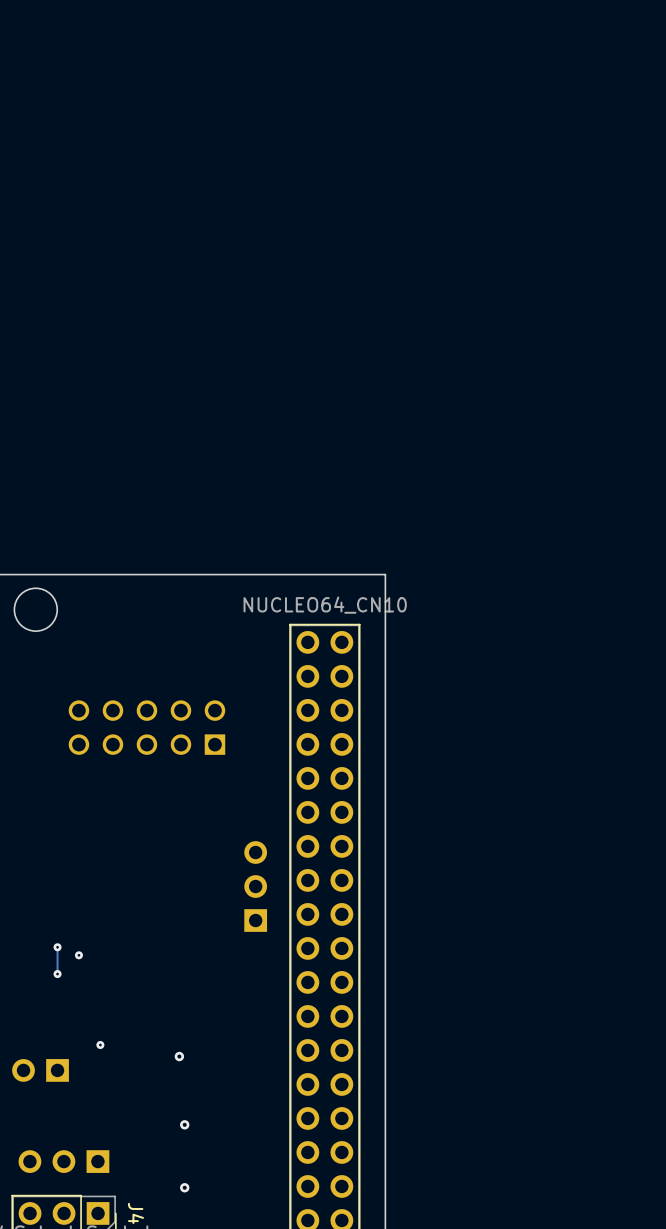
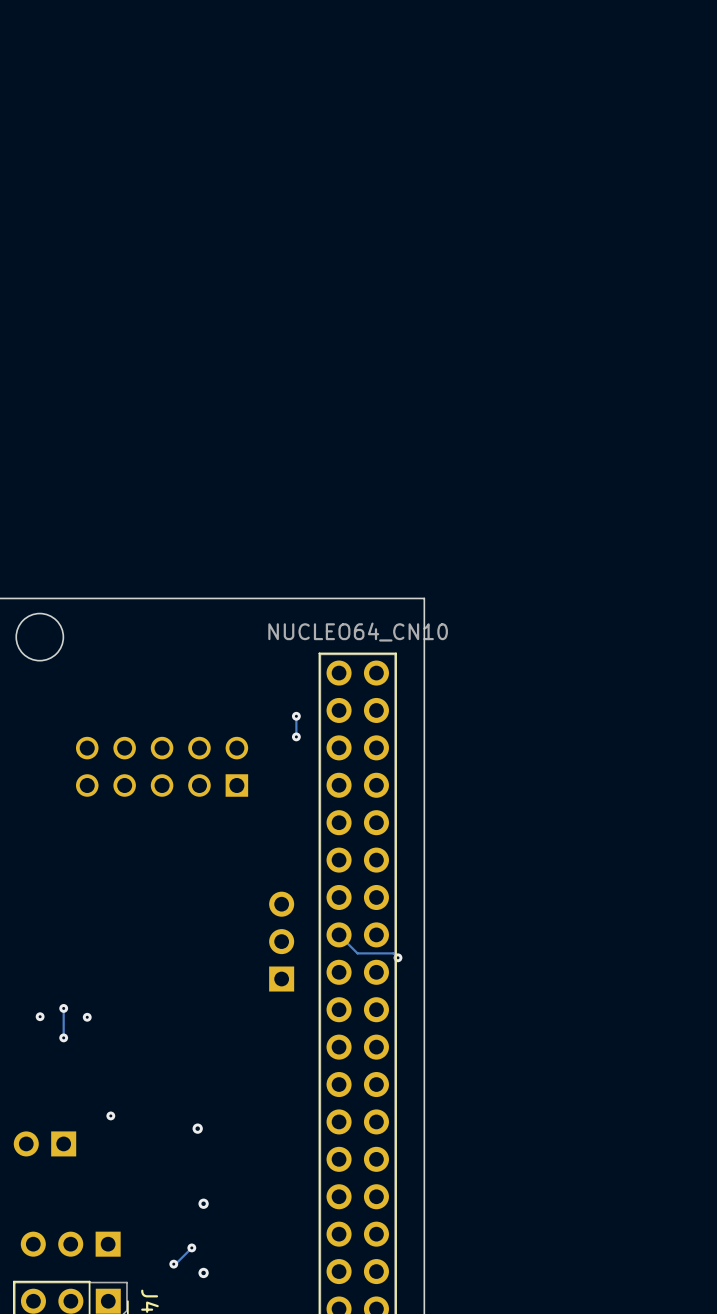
track: none -> (296, 716) (296, 736)
via: none -> (296, 716)
via: none -> (296, 736)
track: none -> (339, 934) (357, 953) (393, 953) (397, 957)
via: none -> (397, 957)
via: none -> (40, 1016)
track: none -> (191, 1247) (173, 1264)
via: none -> (191, 1247)
via: none -> (173, 1264)

